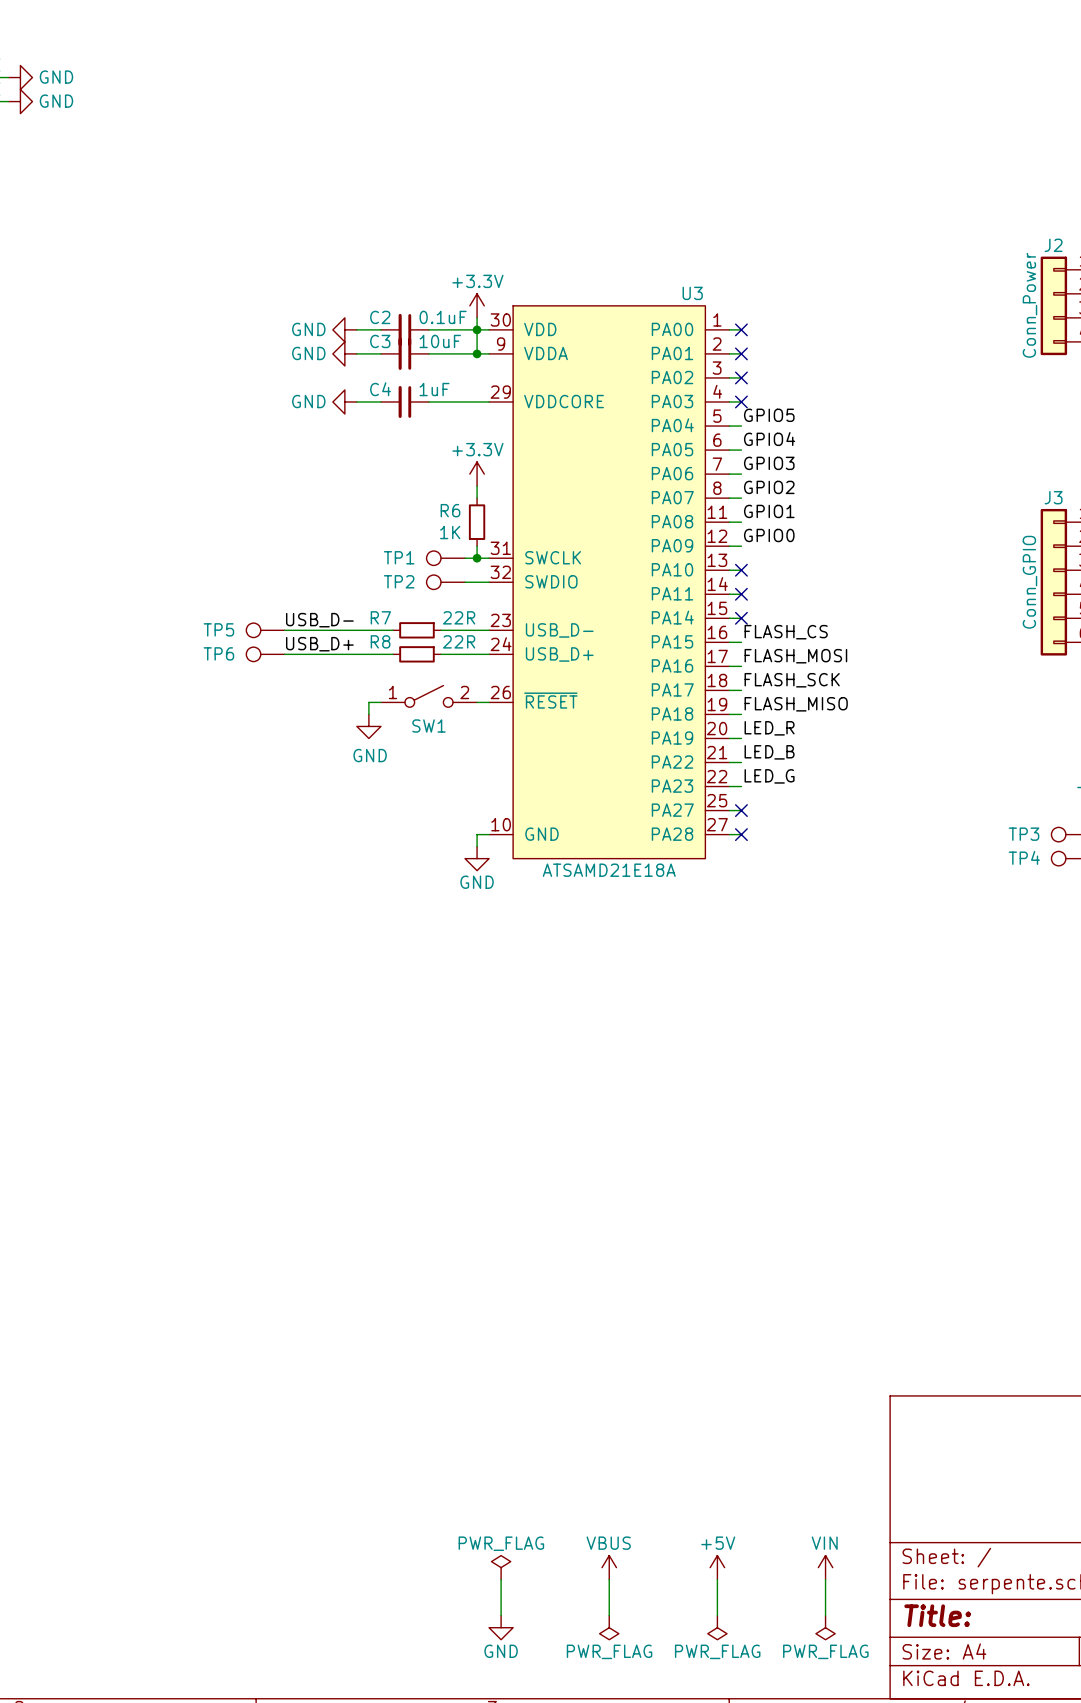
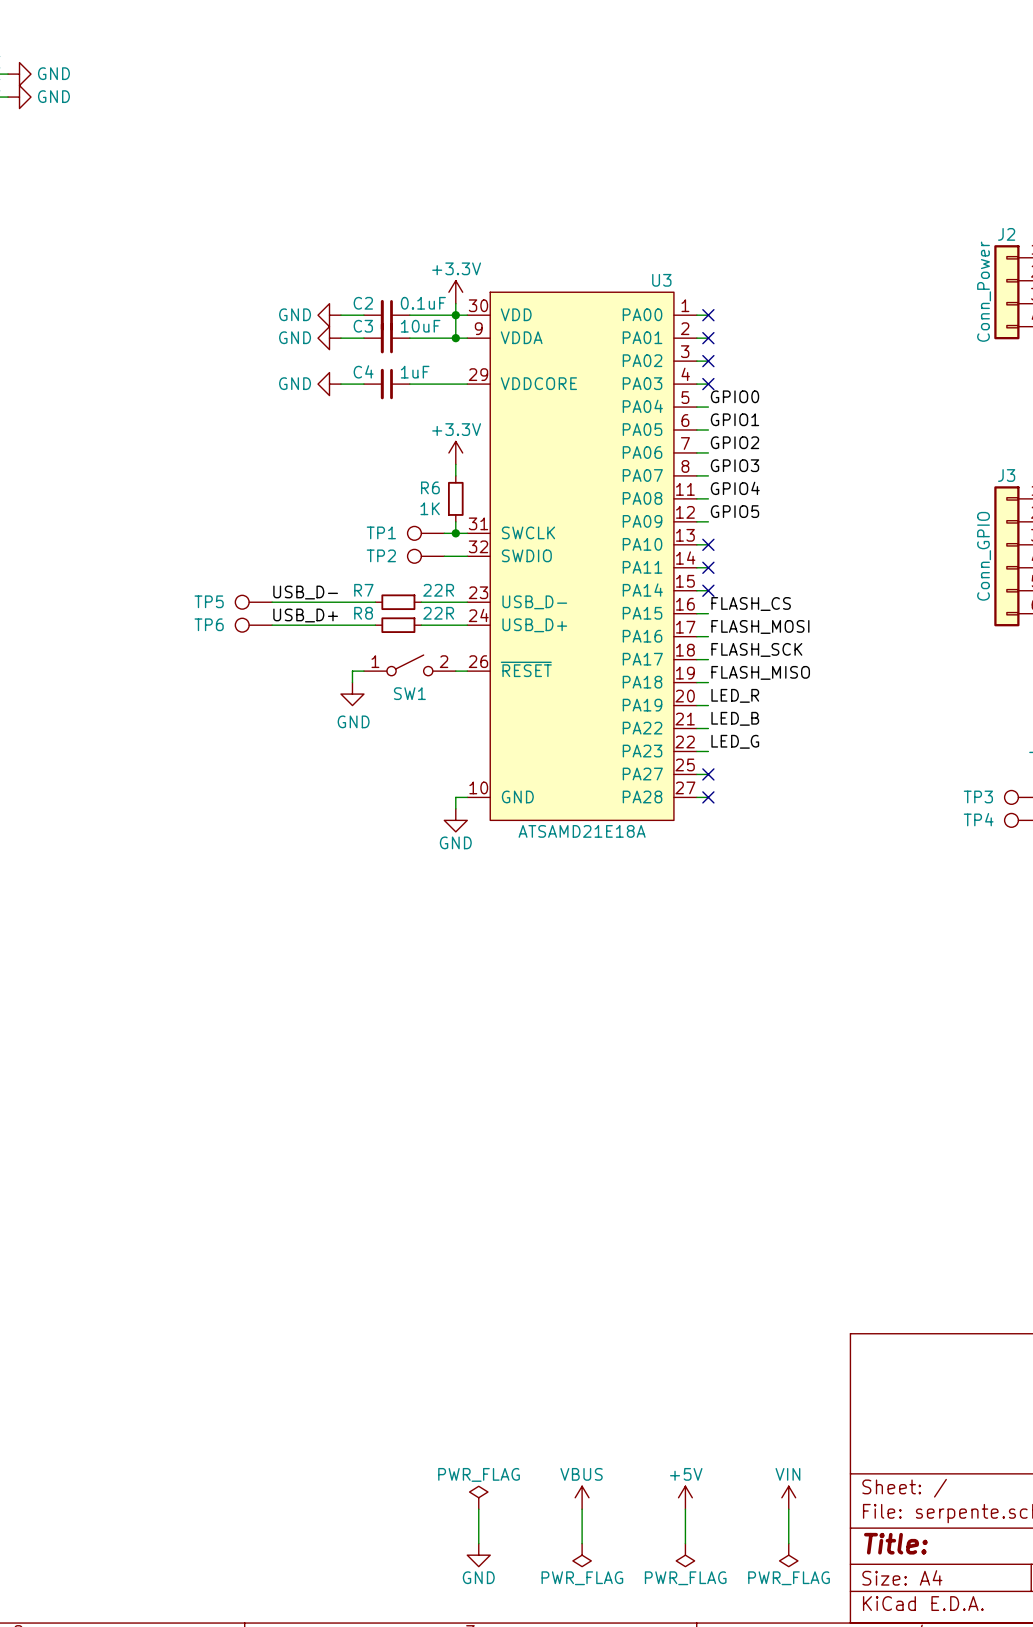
label: GPIO5 (769, 415) -> GPIO0 (734, 396)
label: GPIO4 (769, 439) -> GPIO1 (734, 419)
label: GPIO3 (769, 463) -> GPIO2 (734, 442)
label: GPIO2 (769, 487) -> GPIO3 (734, 465)
label: GPIO1 (769, 511) -> GPIO4 (735, 488)
label: GPIO0 (769, 535) -> GPIO5 (734, 511)

